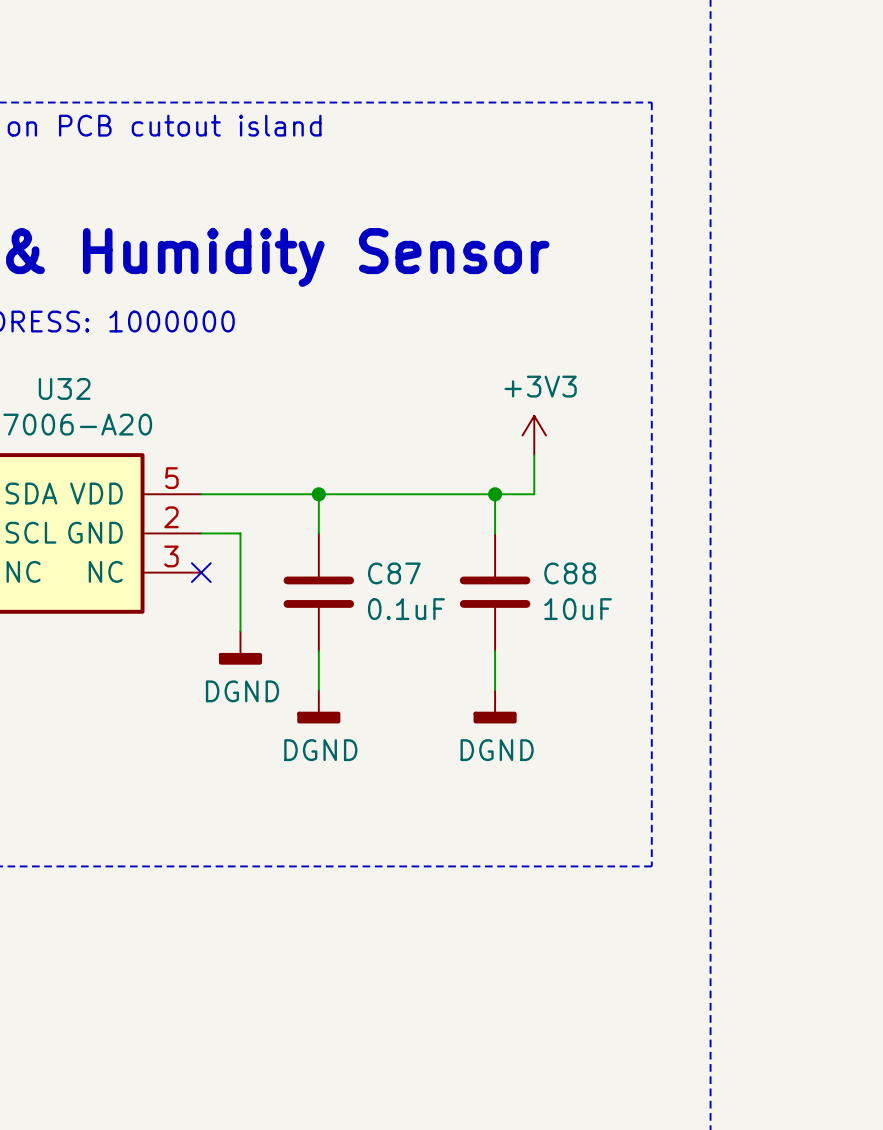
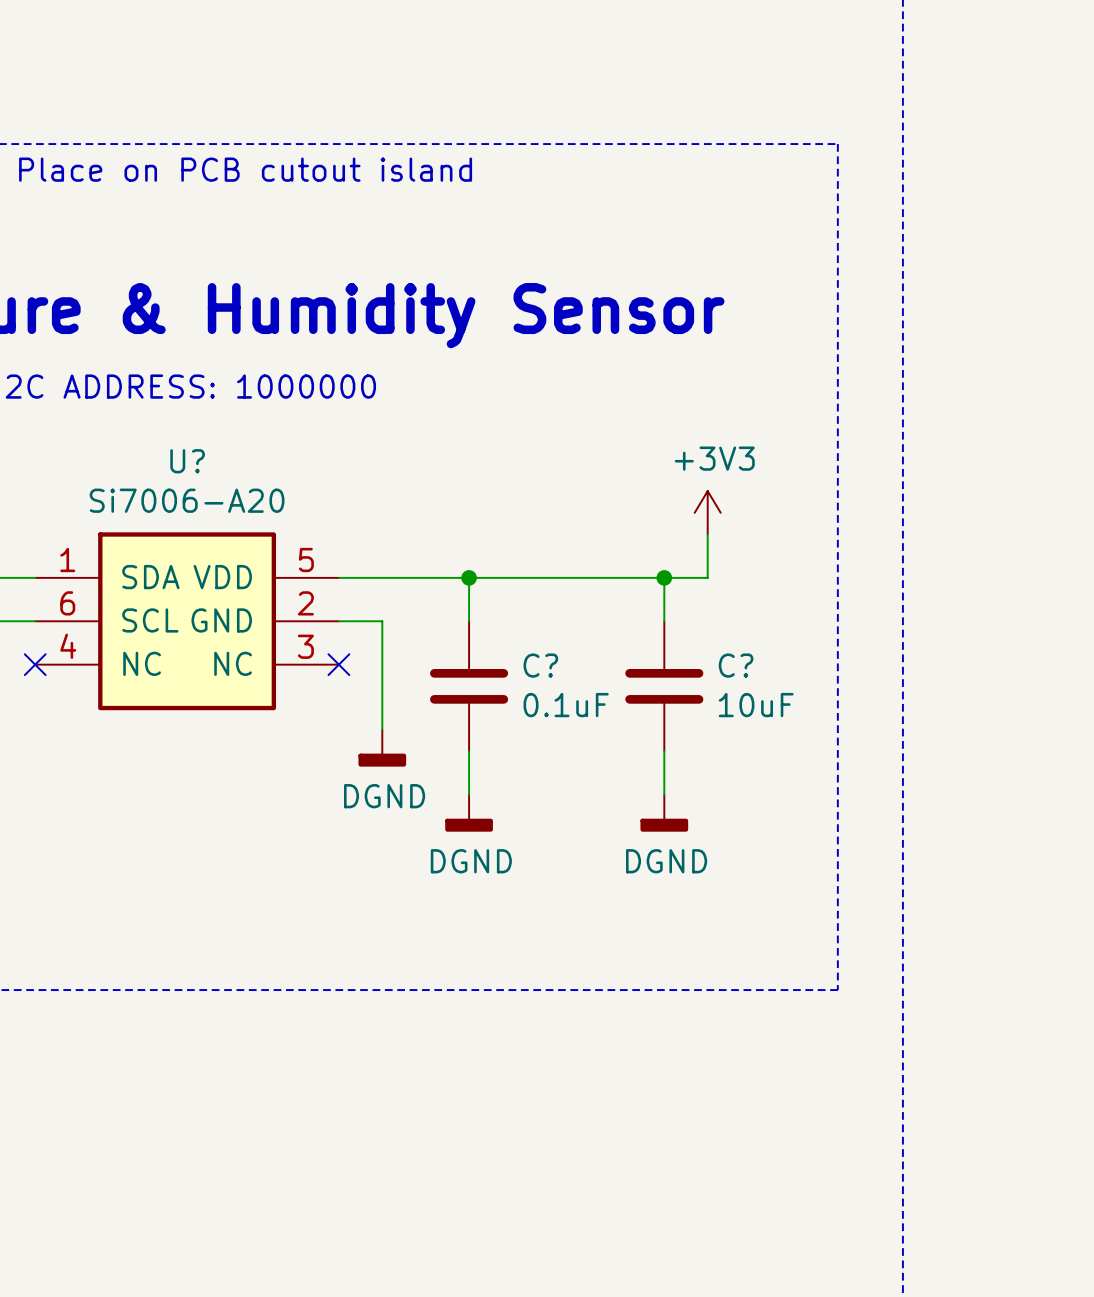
U32 name: U32 (64, 388) -> U? (187, 461)
C87 name: C87 (394, 573) -> C? (540, 665)
C88 name: C88 (570, 573) -> C? (736, 665)

